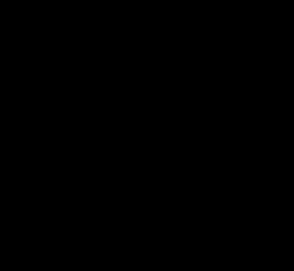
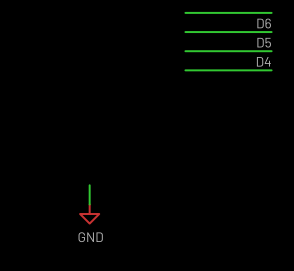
wire: none -> (185, 12) (271, 12)
label: none -> D6 (264, 23)
wire: none -> (185, 32) (271, 32)
label: none -> D5 (264, 42)
wire: none -> (185, 51) (271, 51)
label: none -> D4 (263, 61)
wire: none -> (185, 70) (271, 70)
wire: none -> (89, 185) (89, 204)
power symbol: none -> GND (89, 214)

